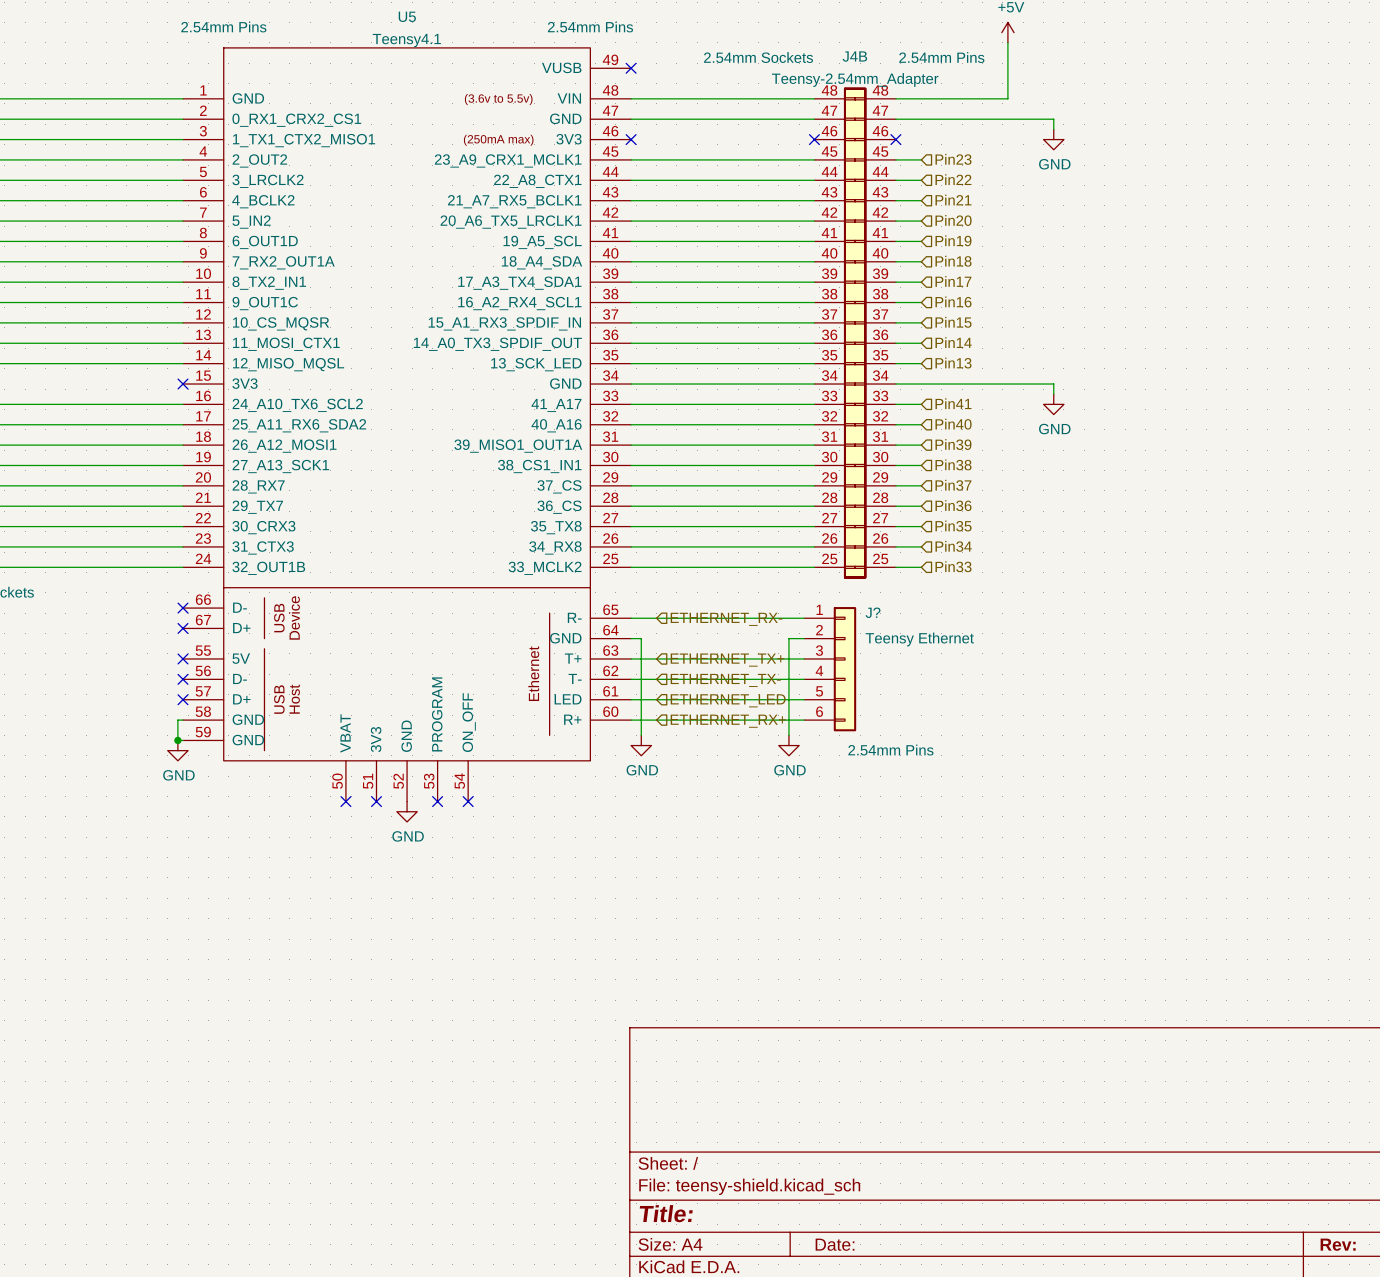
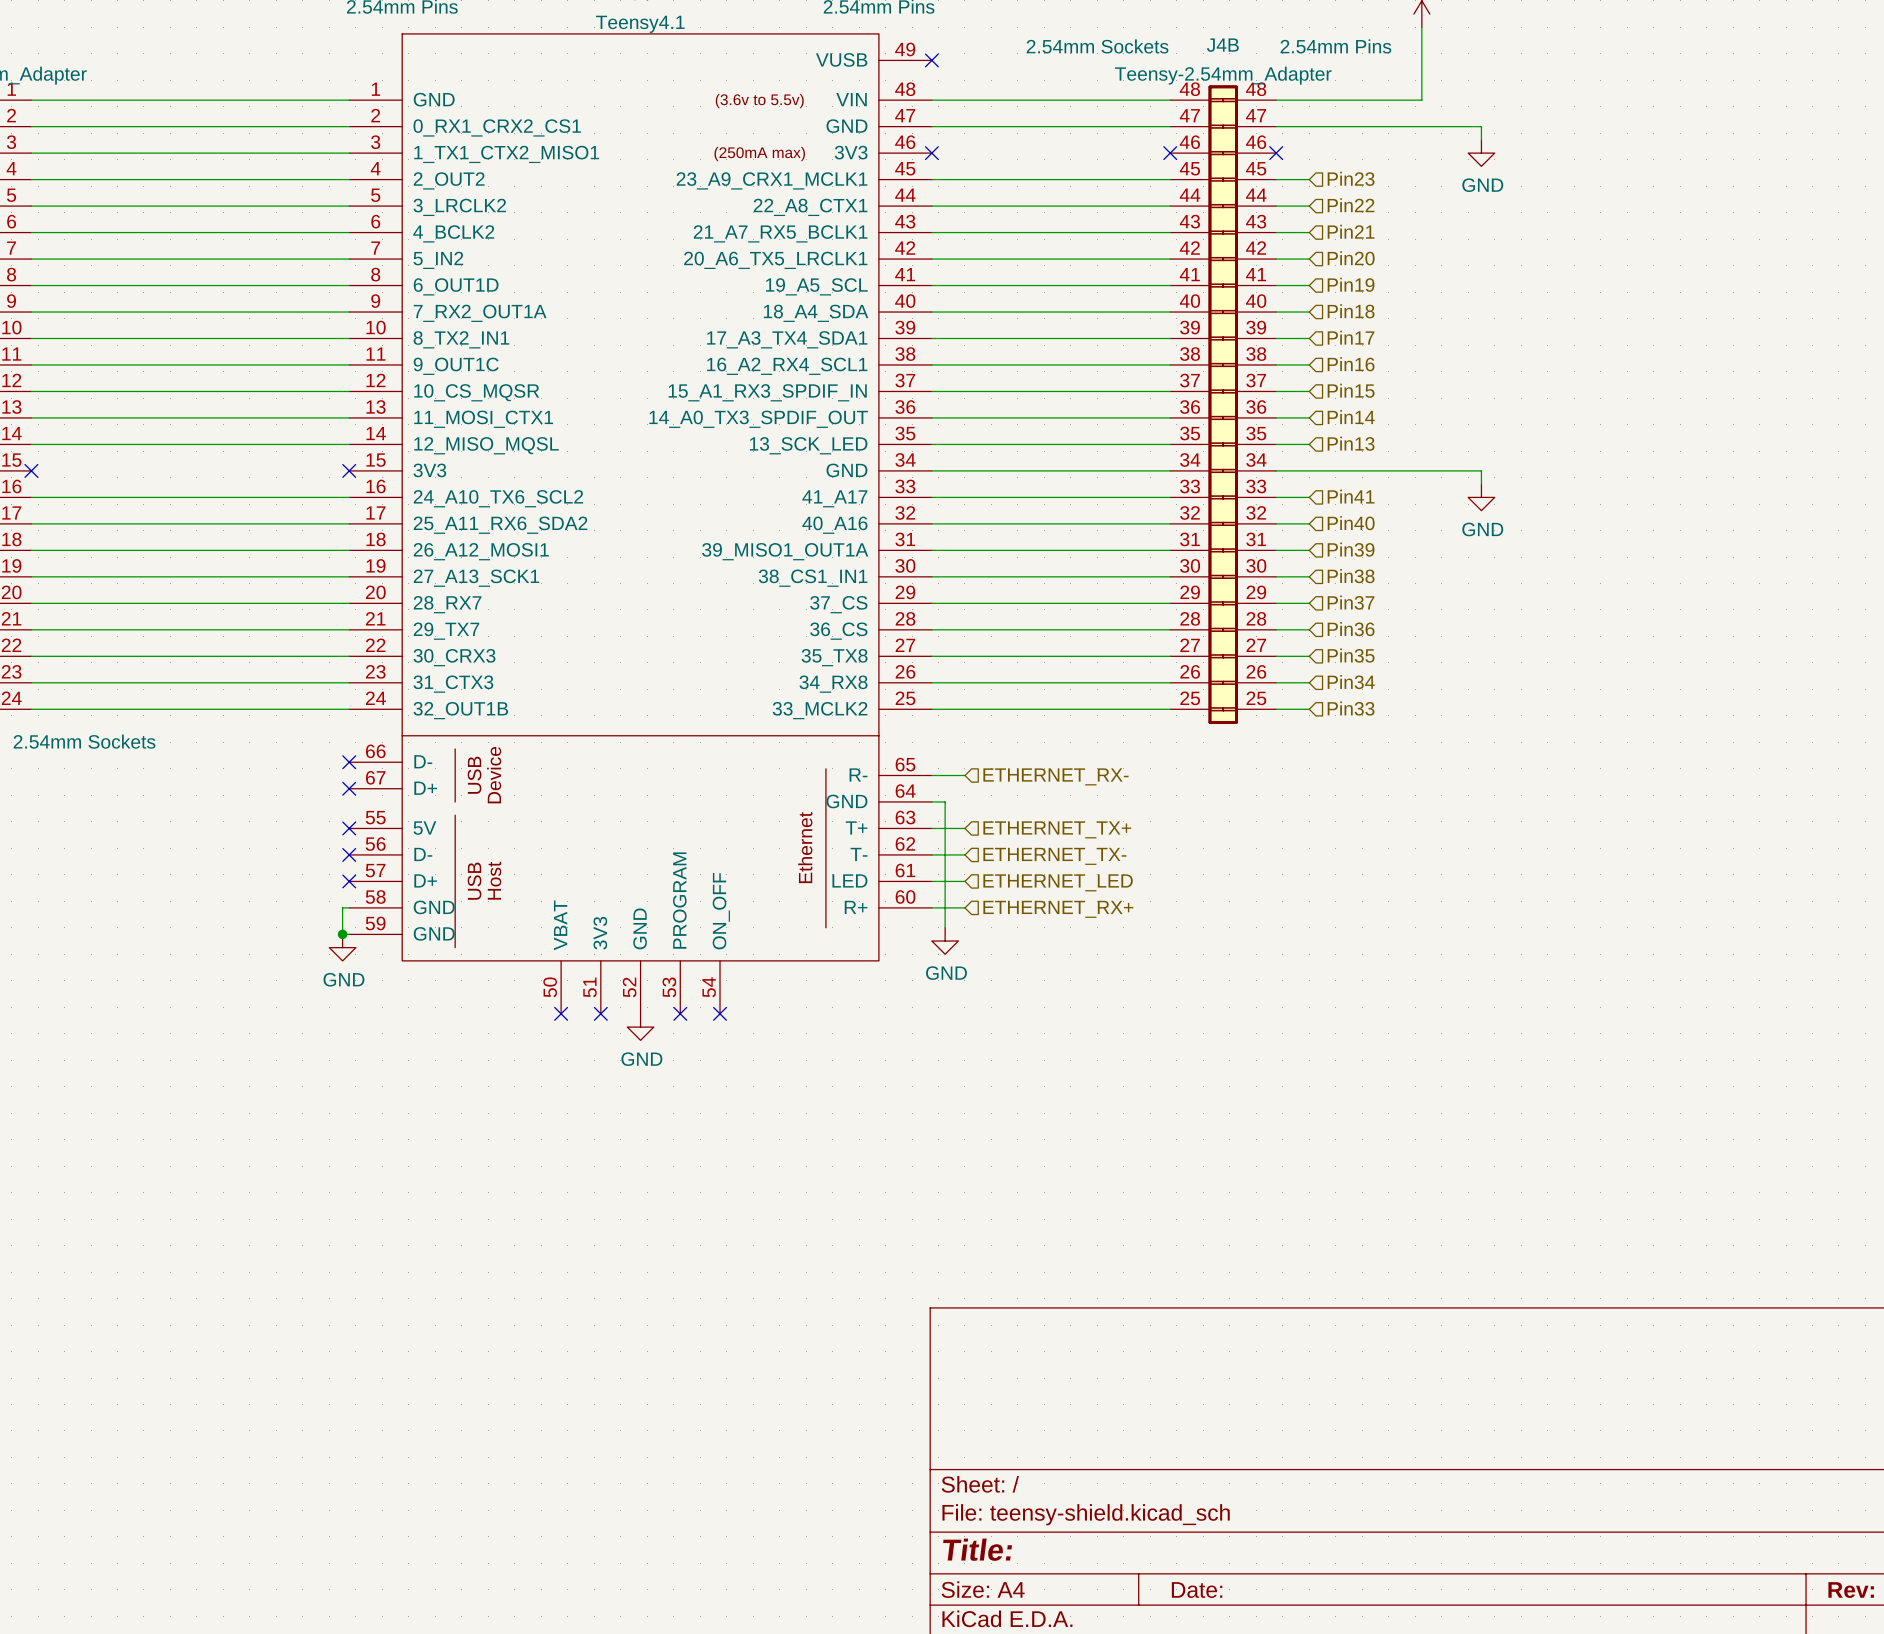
wire: (656, 618) (804, 618) -> none
wire: (804, 638) (788, 638) (788, 735) -> none
wire: (656, 658) (804, 658) -> none
J?: Teensy Ethernet (830, 669) -> none
wire: (656, 679) (804, 679) -> none
wire: (656, 699) (804, 699) -> none
wire: (656, 720) (804, 720) -> none
power symbol: GND (788, 745) -> none

